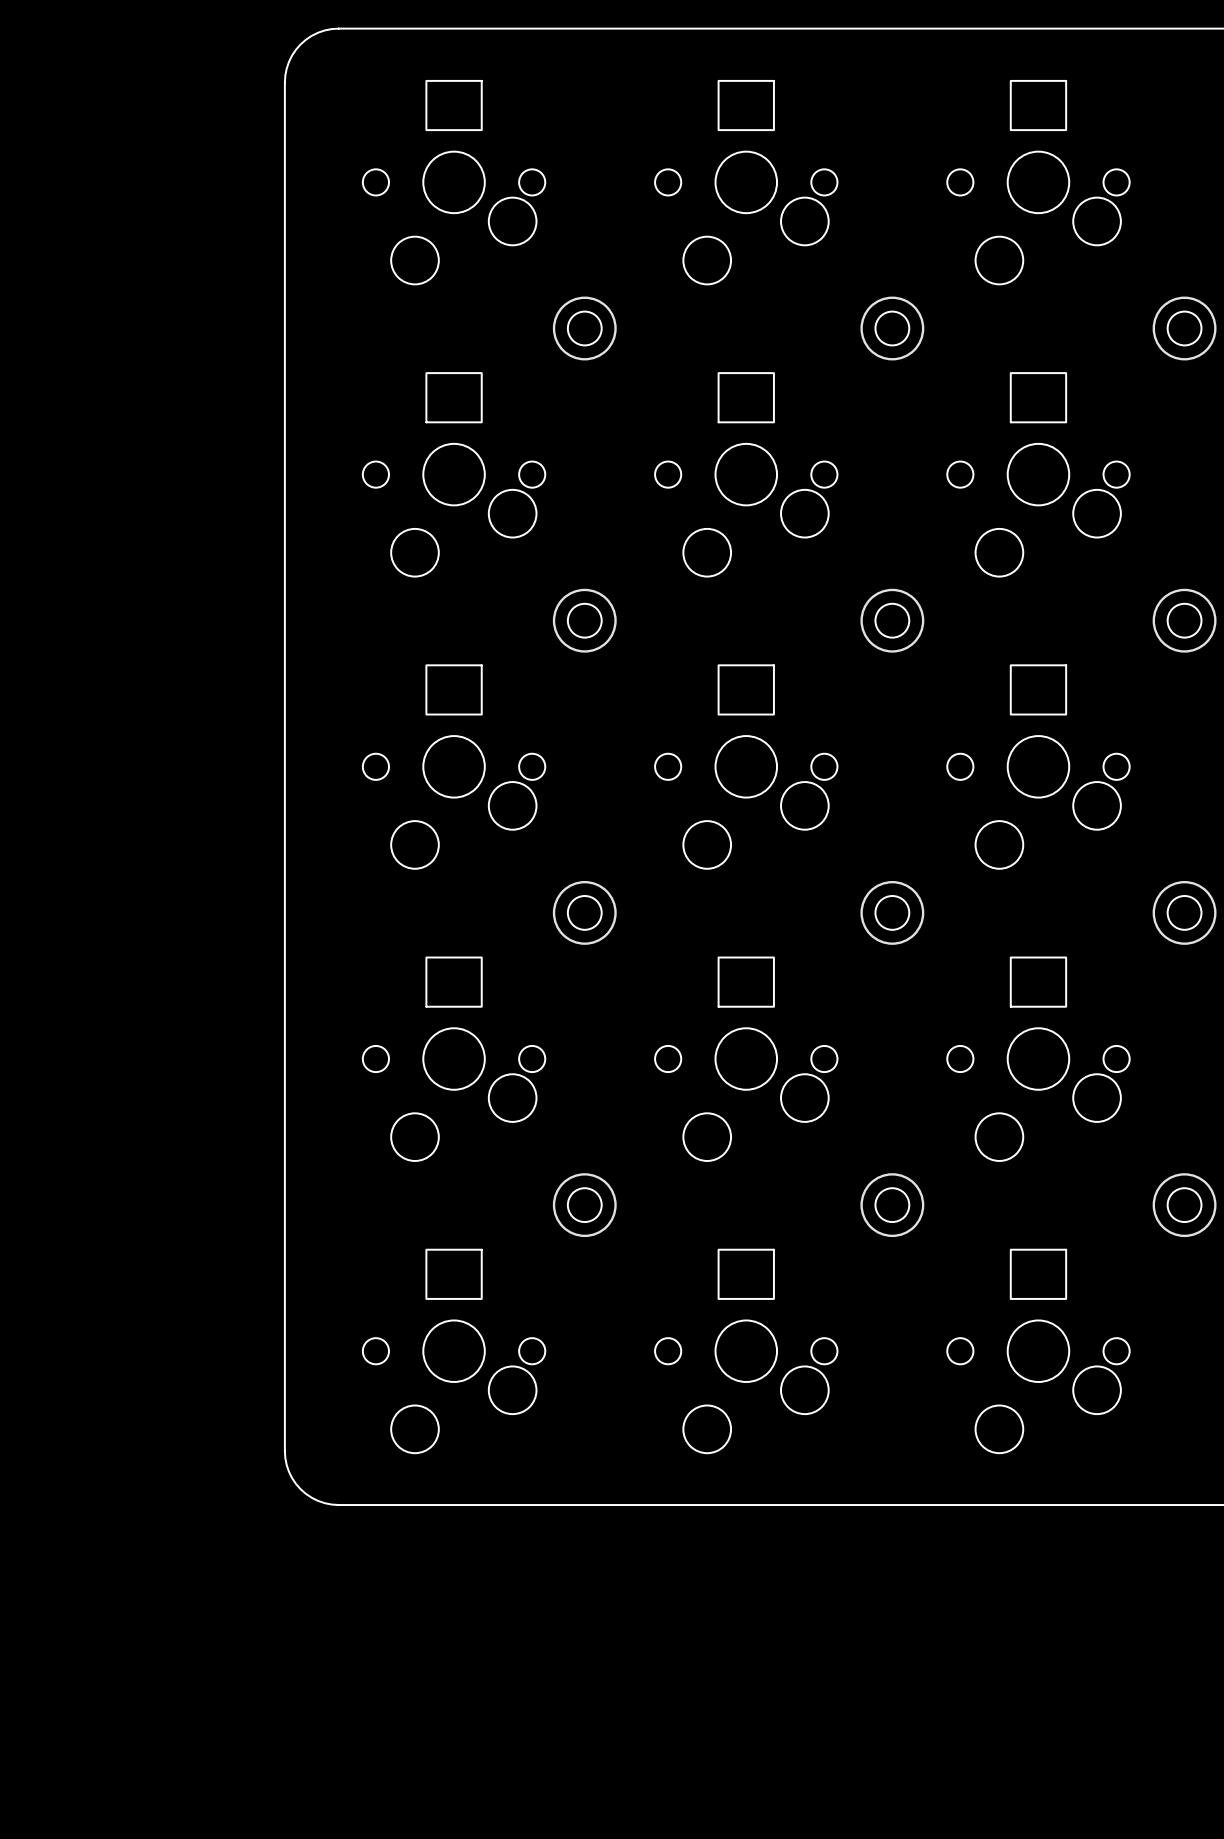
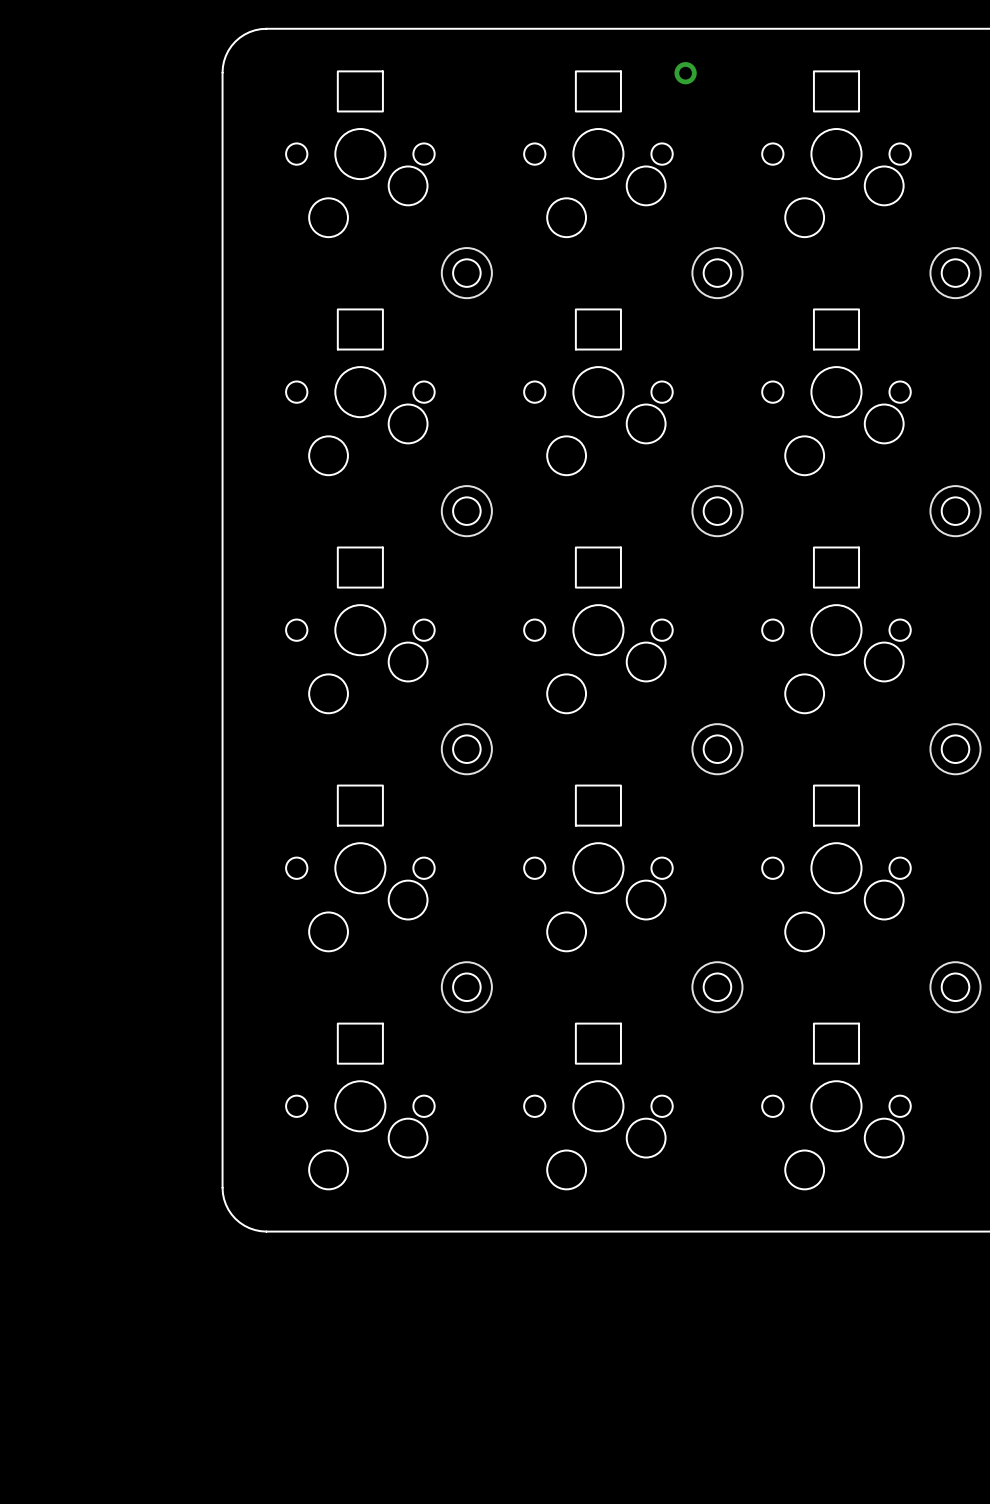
part: none -> (685, 73)

